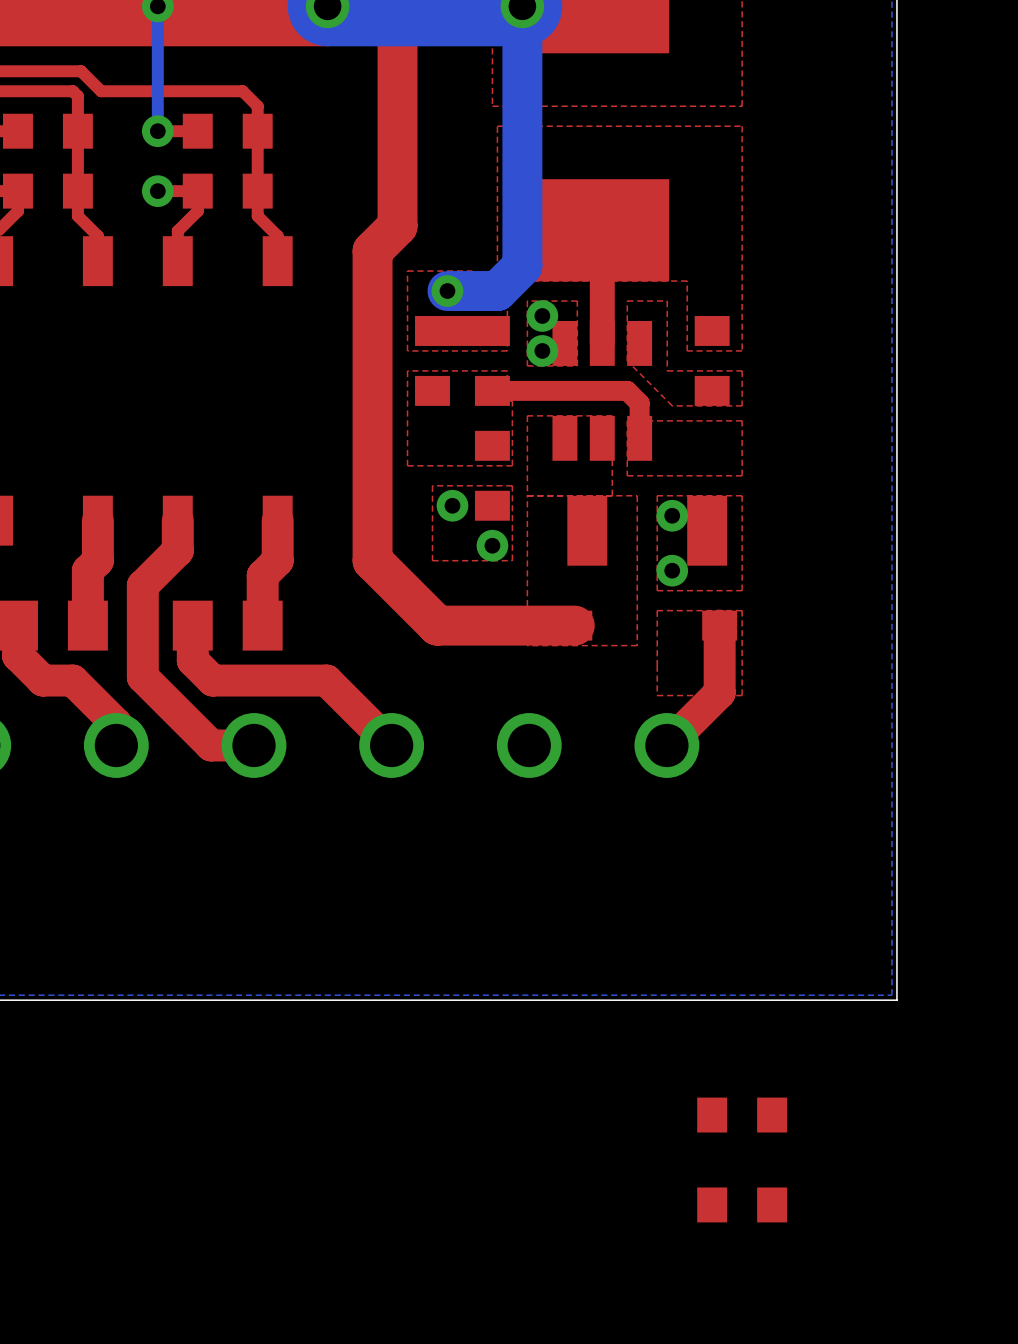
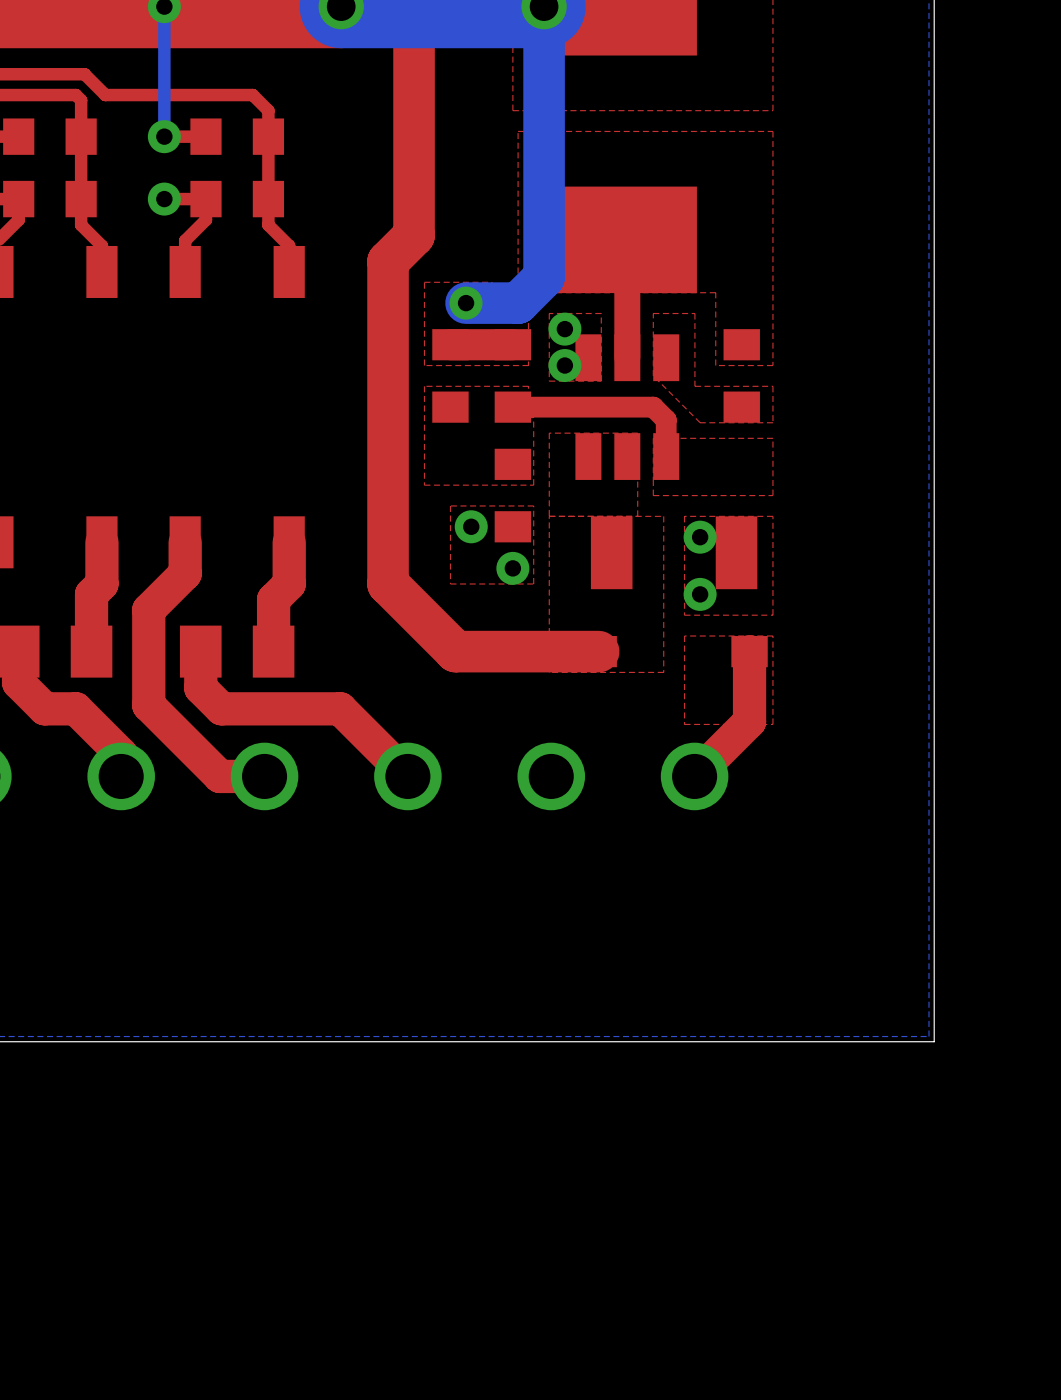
part: (742, 1115) -> none
part: (742, 1204) -> none

